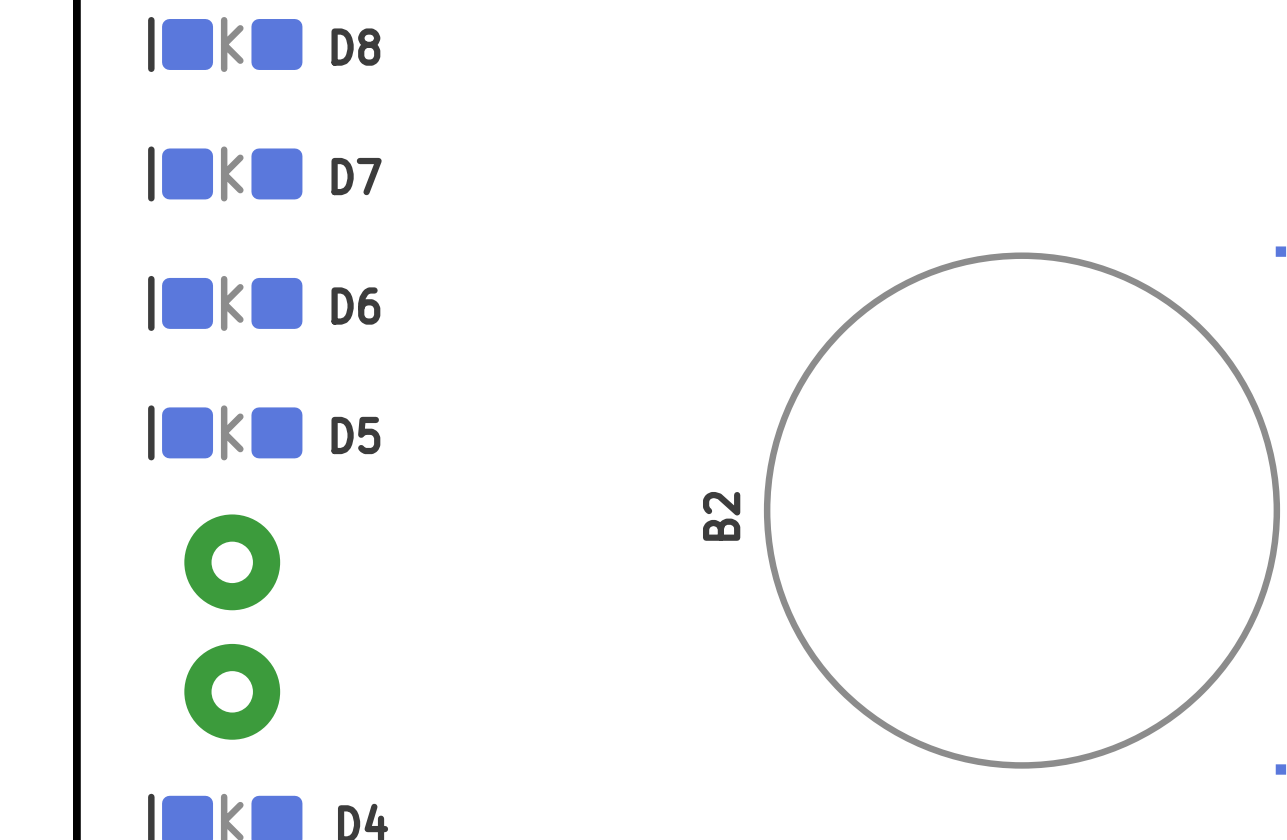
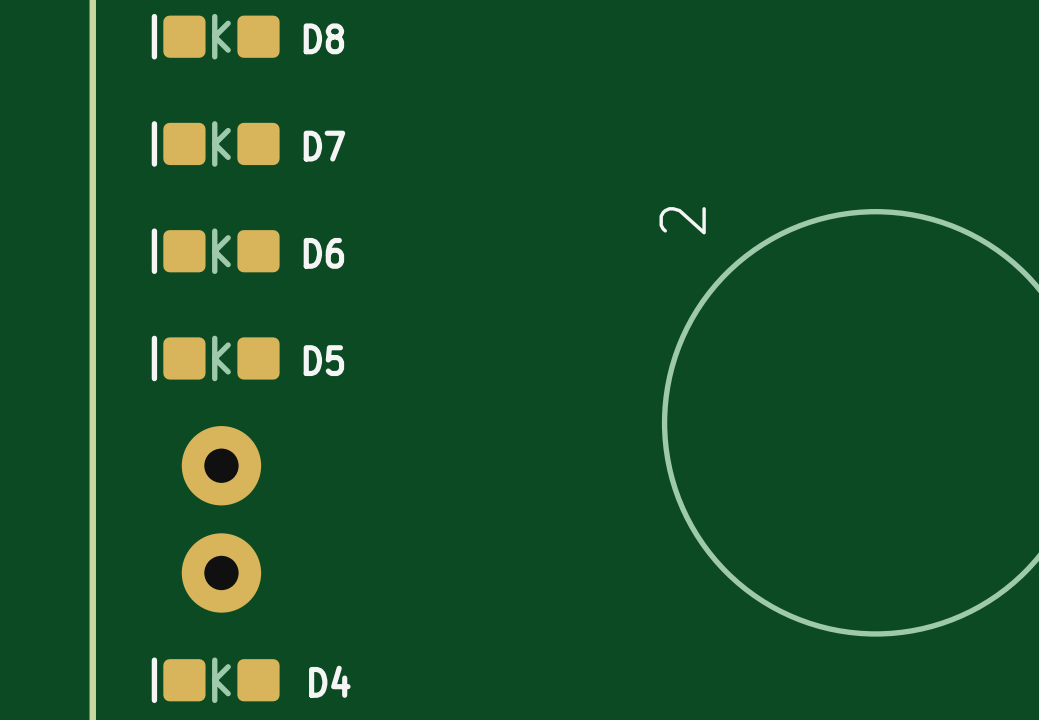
text: none -> 2 (682, 220)
B2 name: B2 (721, 516) -> none

